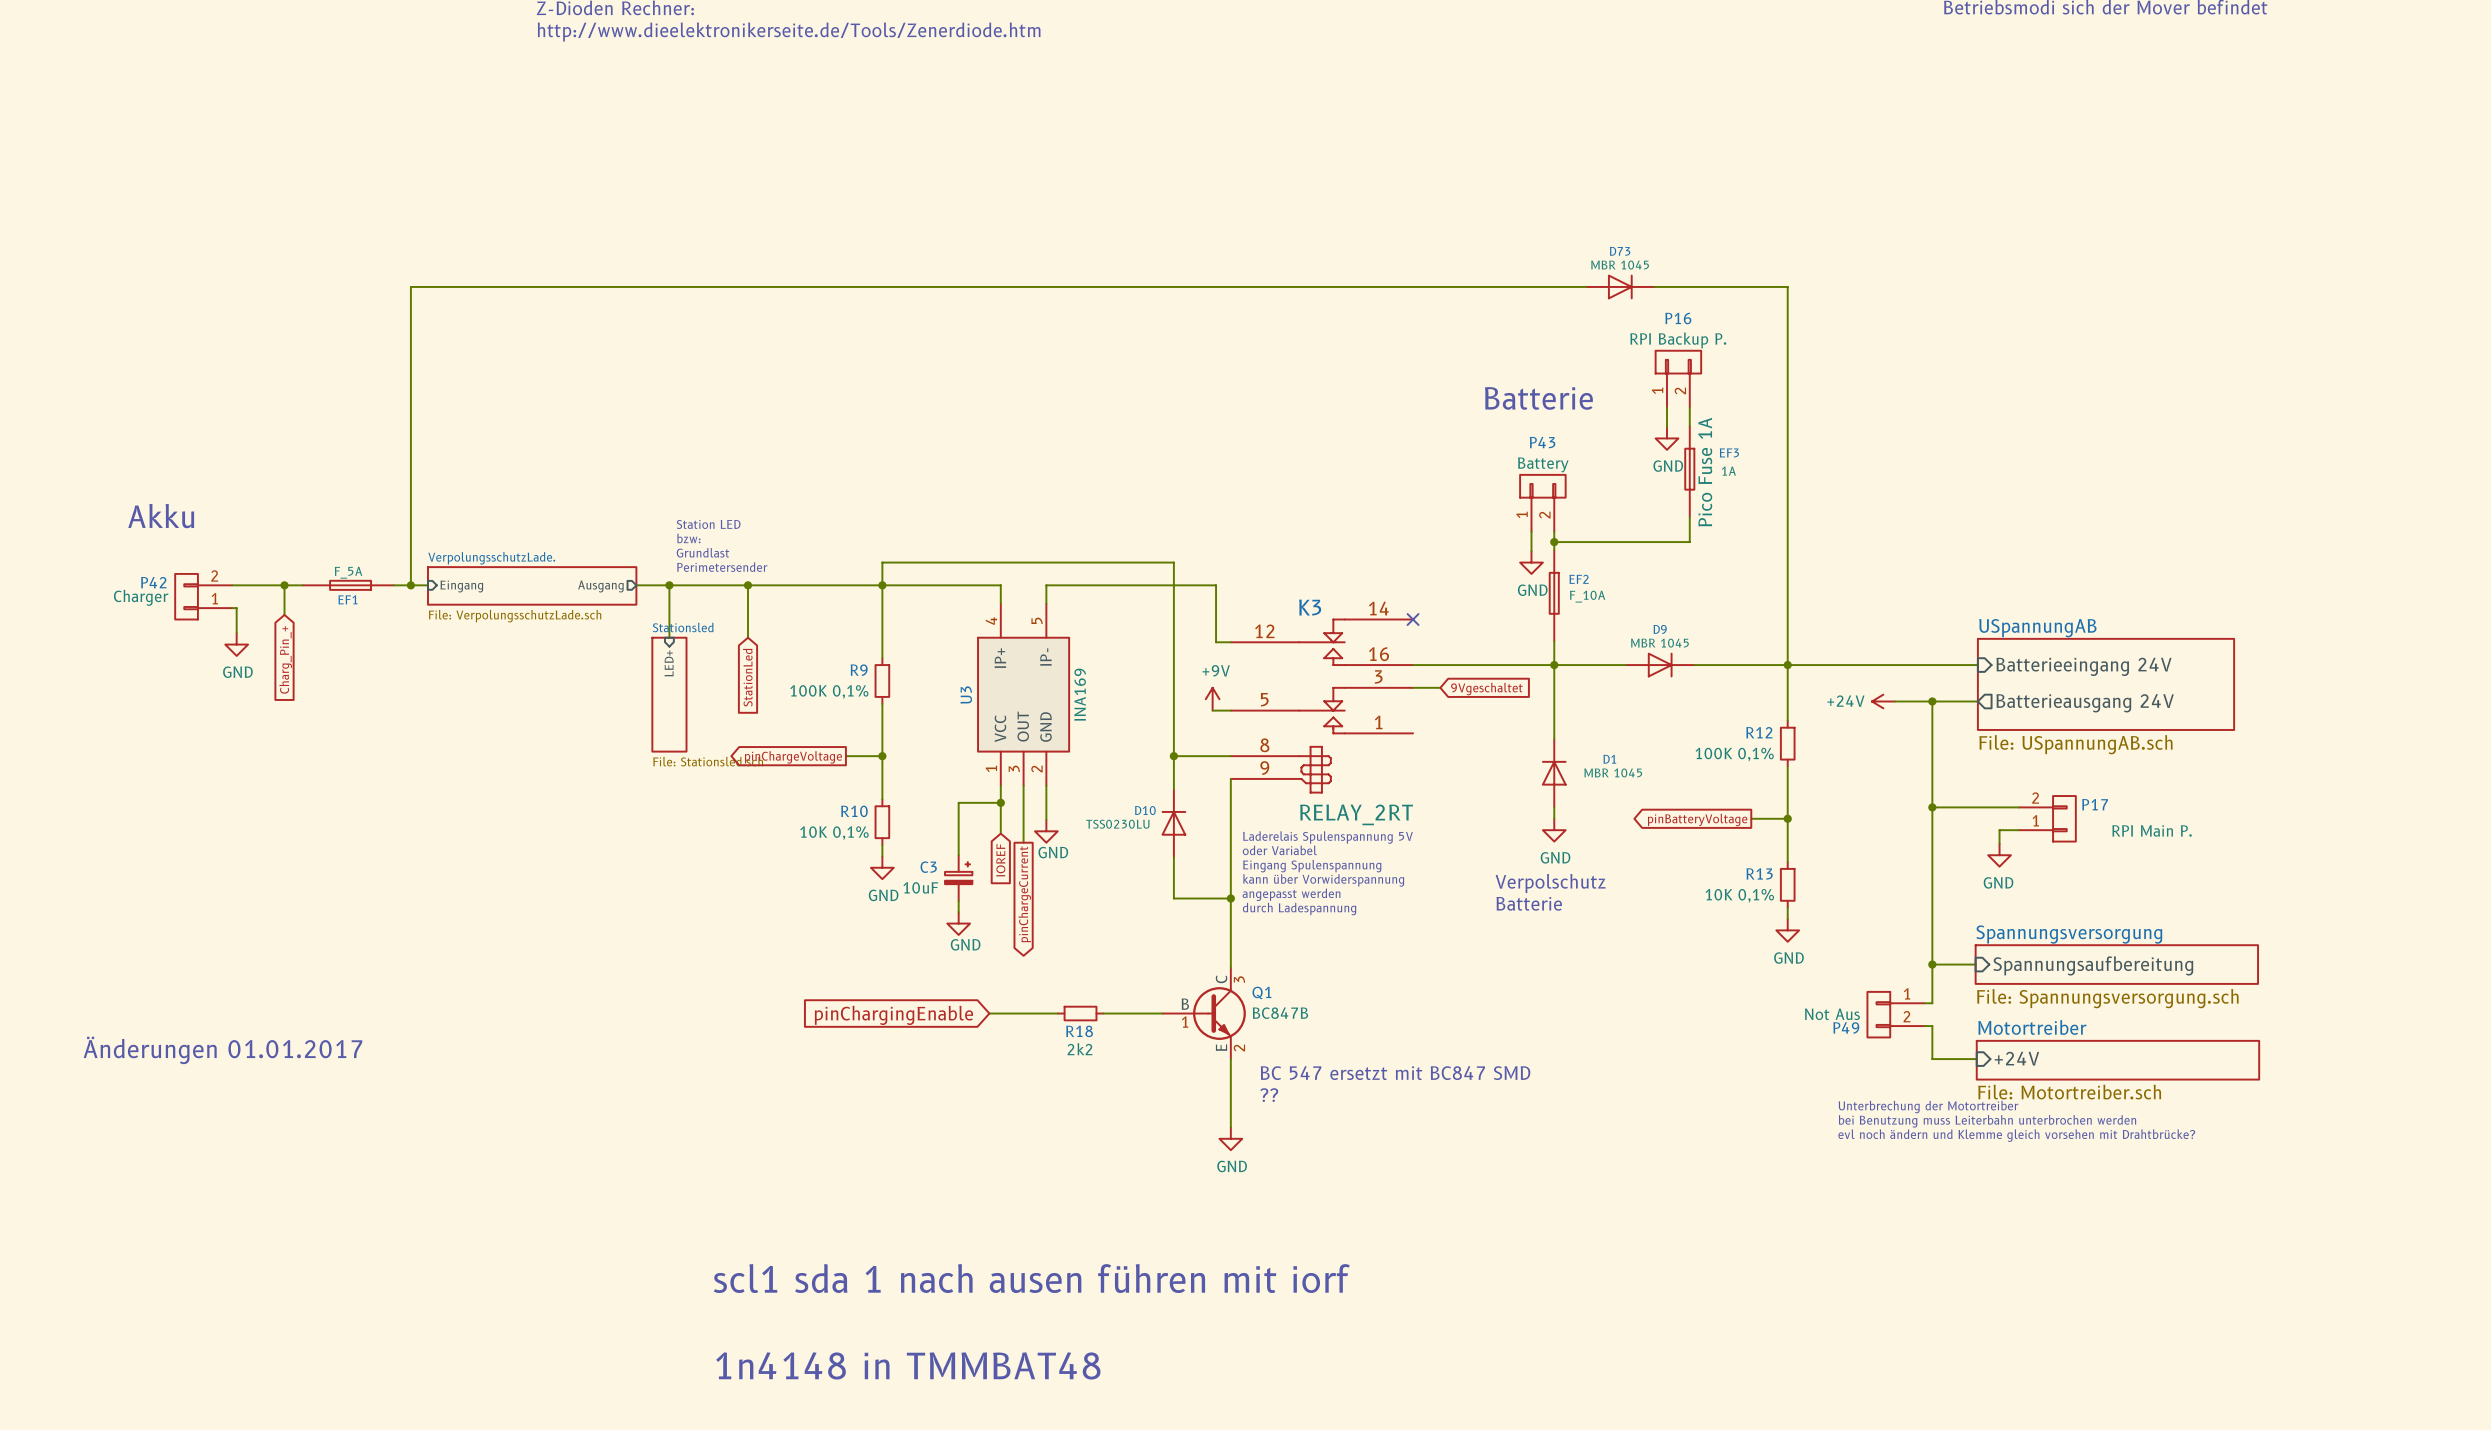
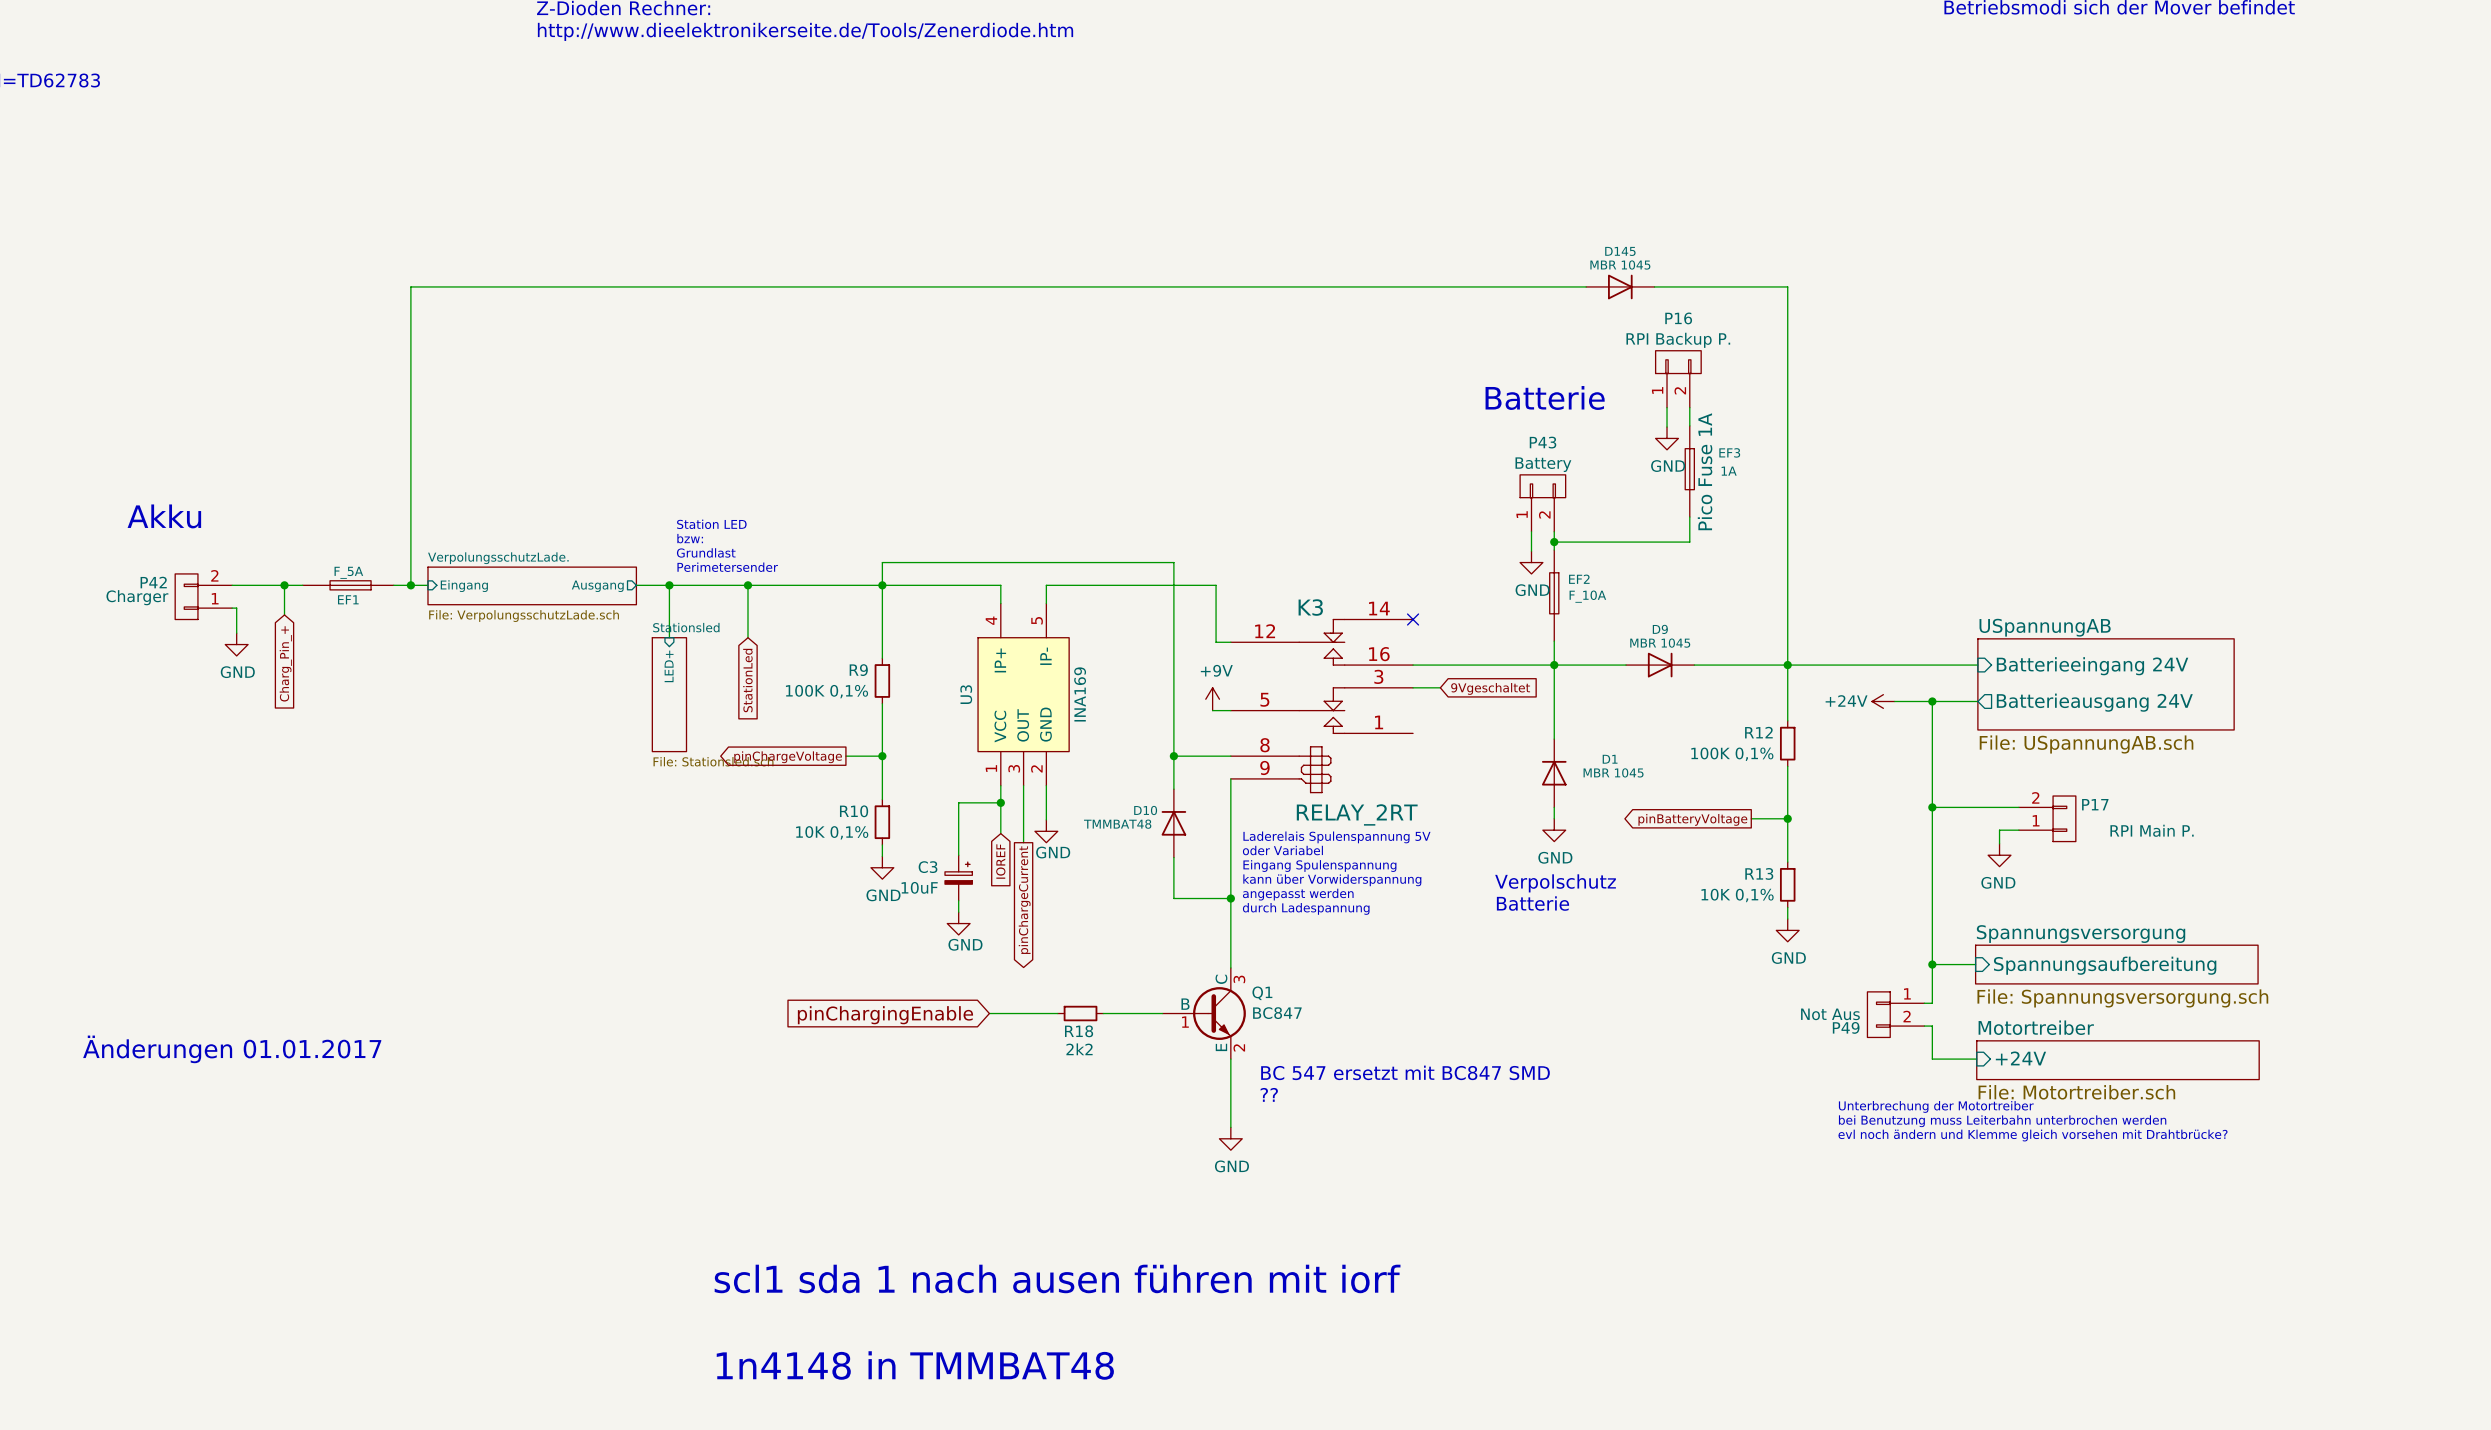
D73 name: D73 (1620, 251) -> D145 (1620, 251)
D10 value: TSS0230LU (1117, 824) -> TMMBAT48 (1117, 824)
Q1 value: BC847B (1280, 1013) -> BC847 (1277, 1013)

